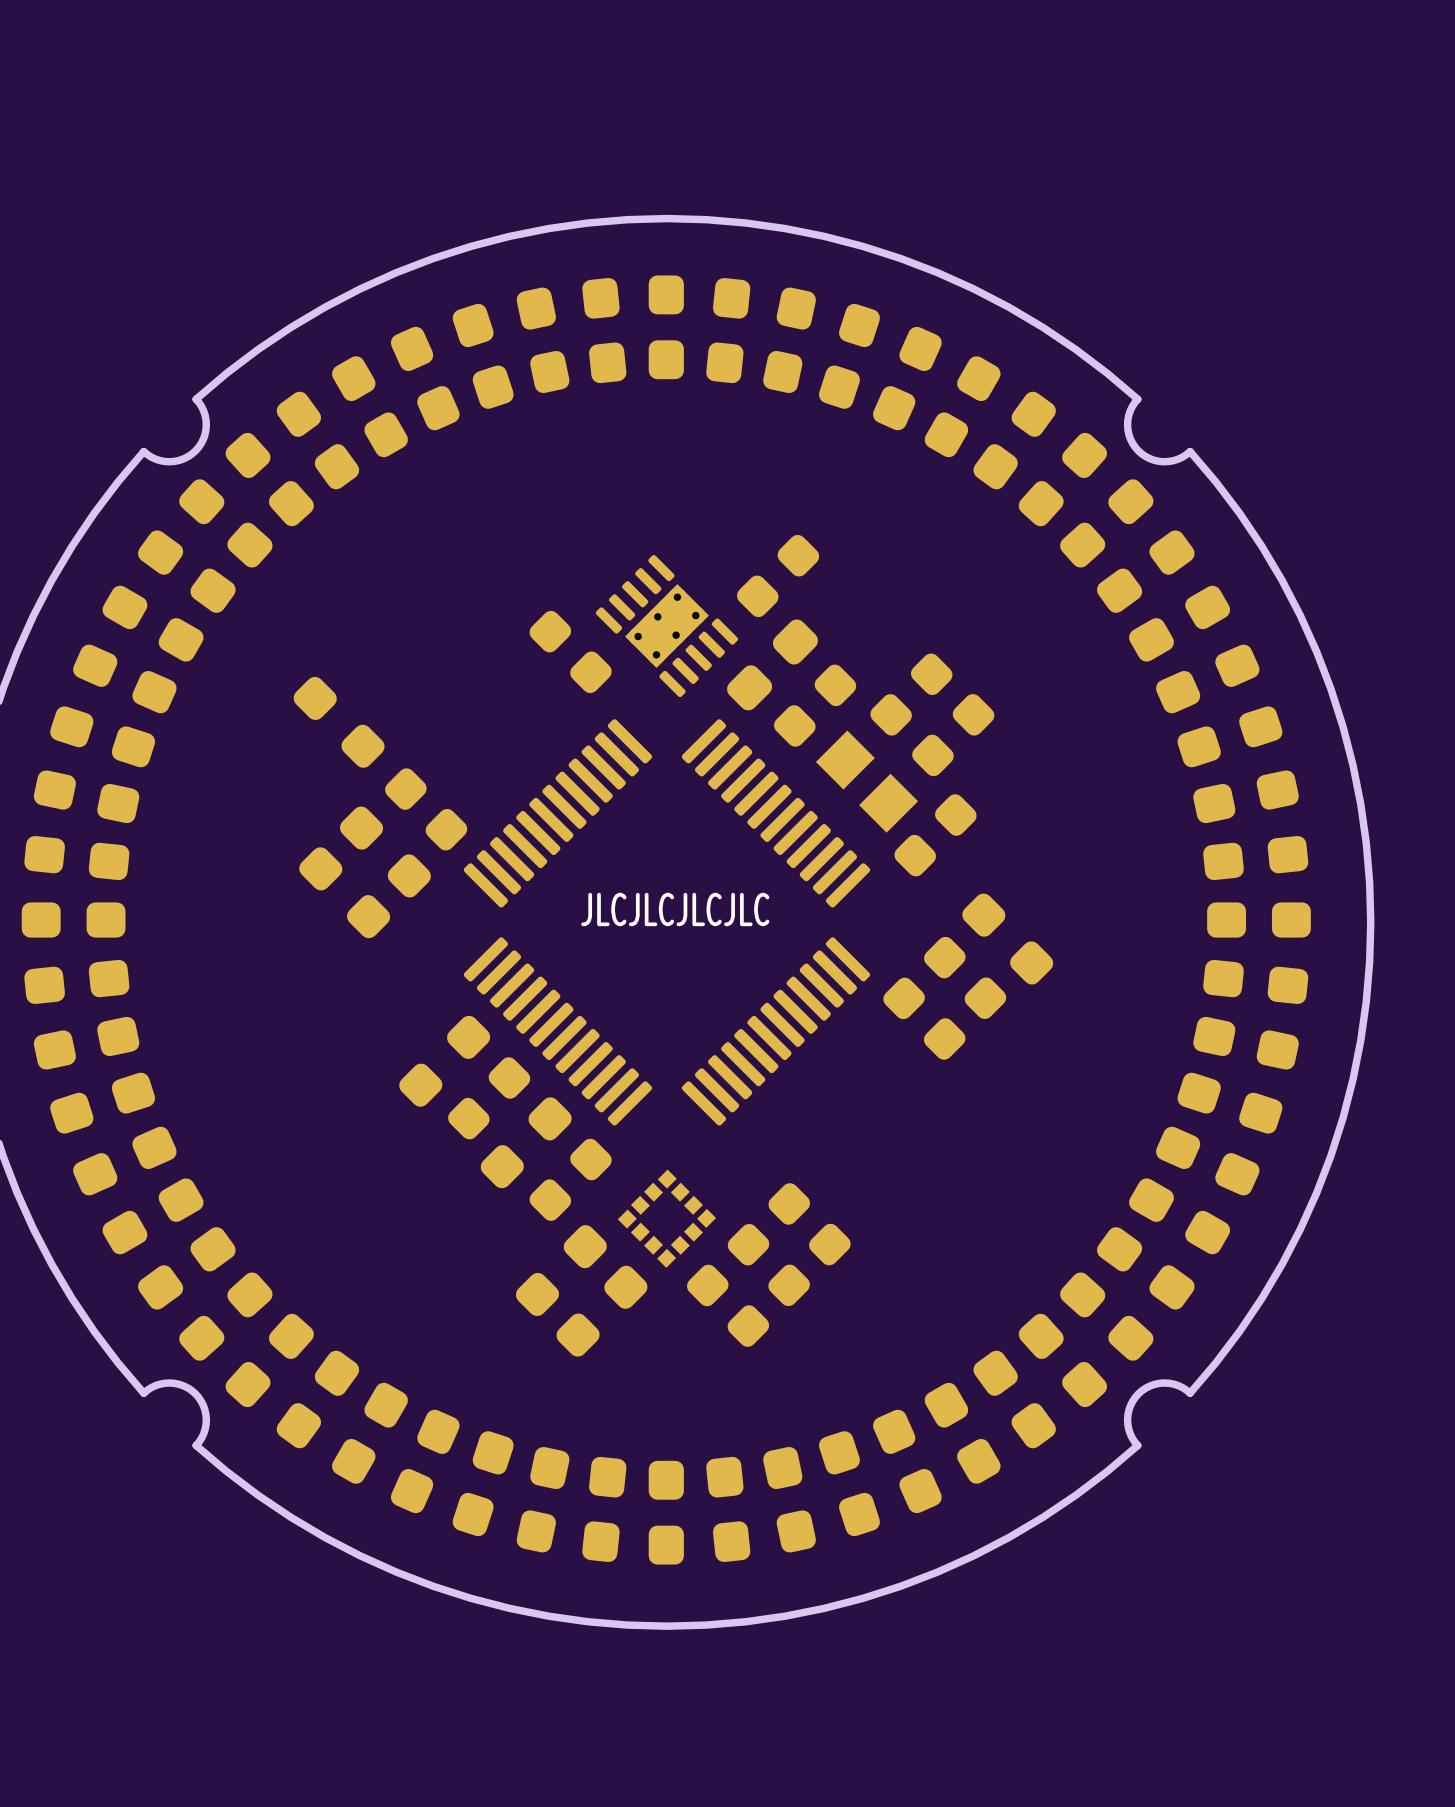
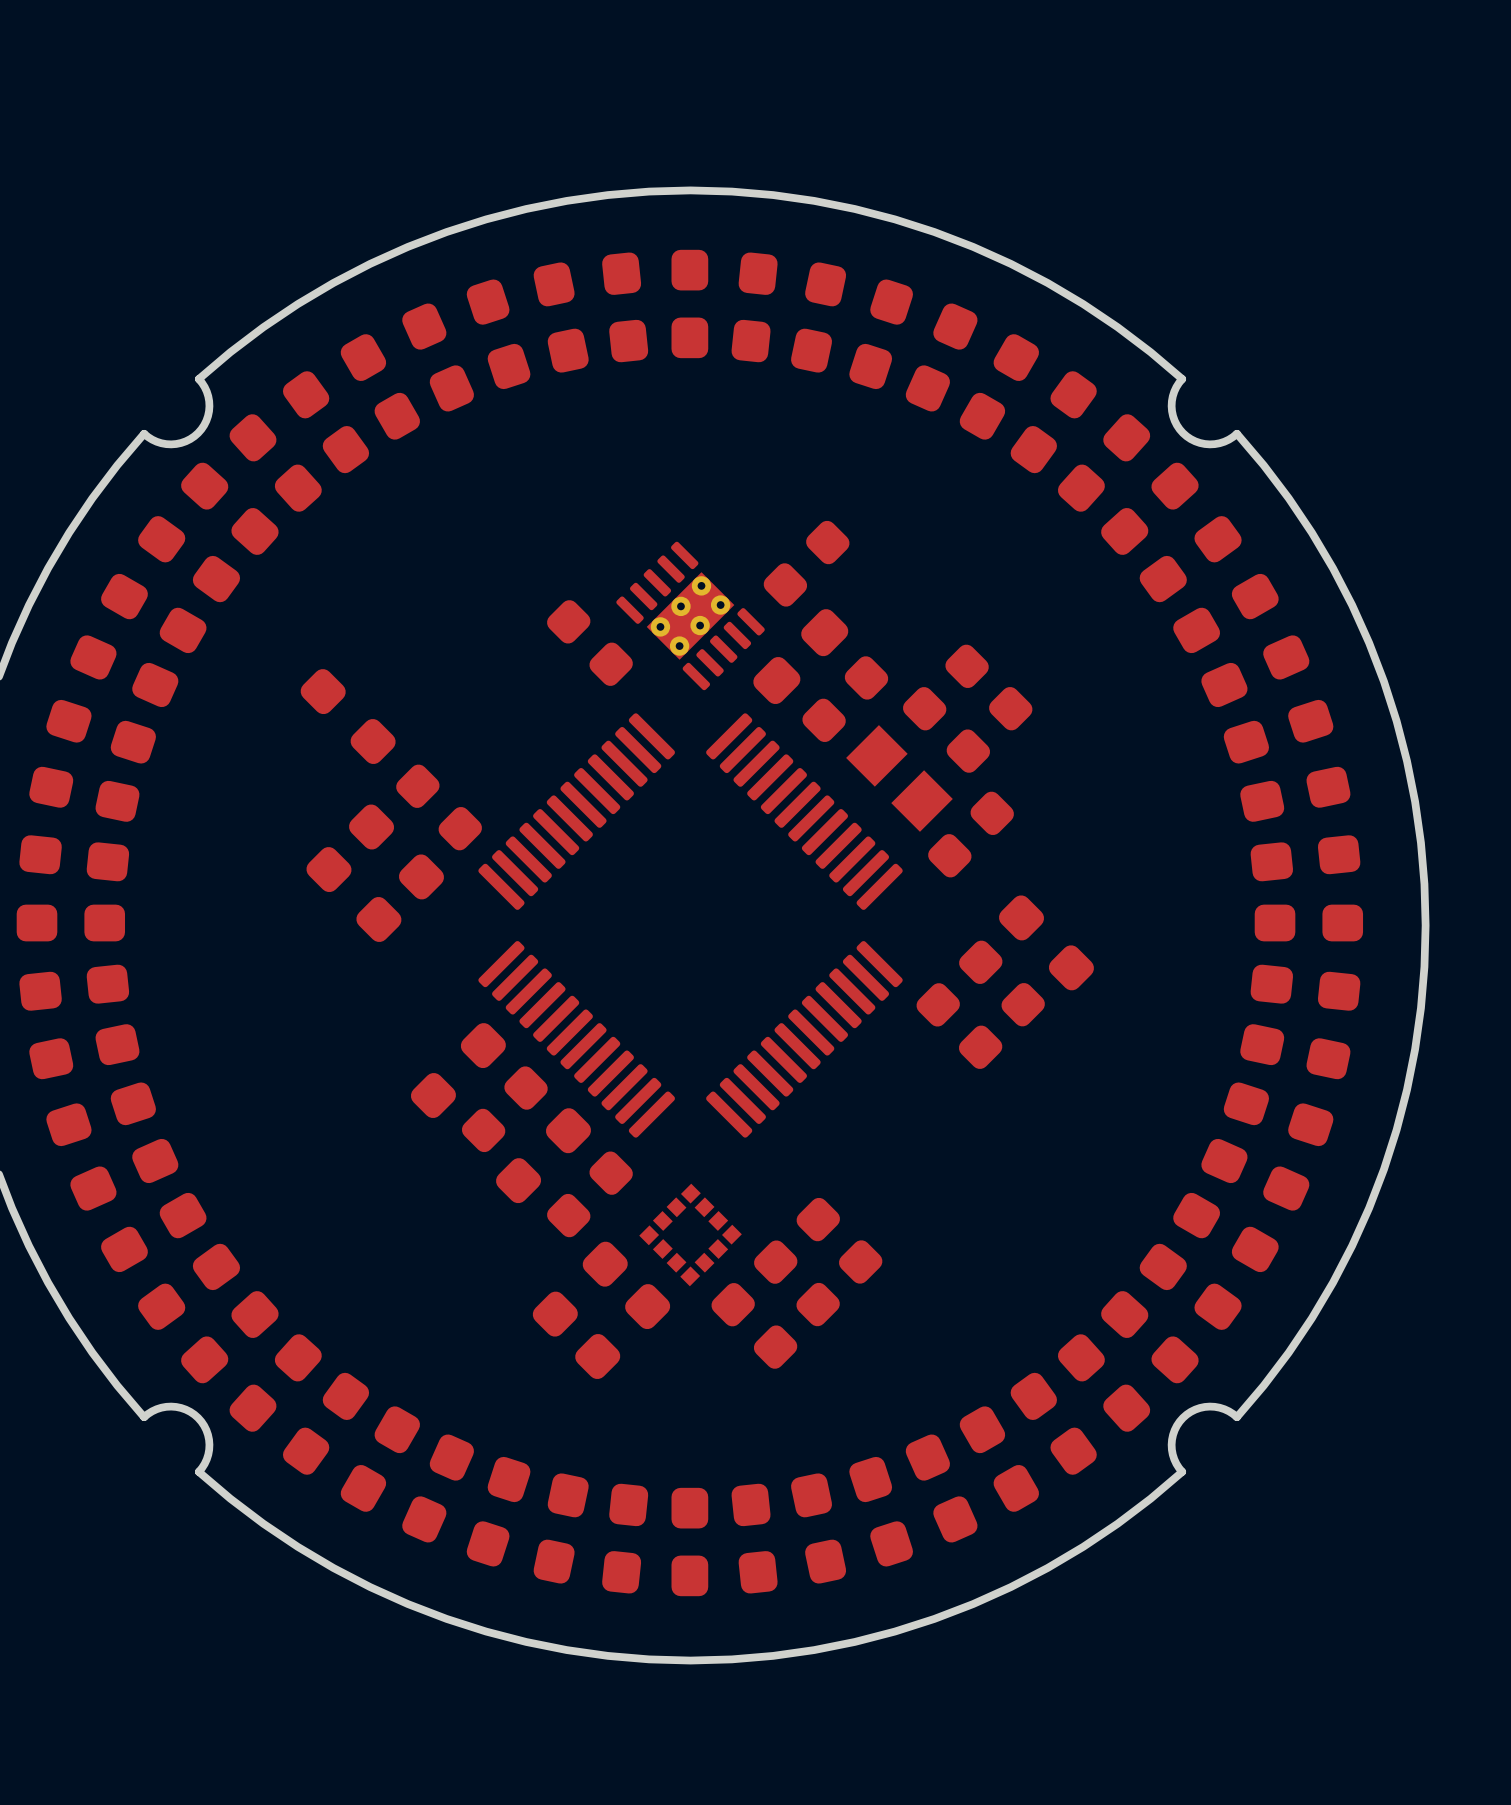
text: JLCJLCJLCJLC (675, 909) -> none

